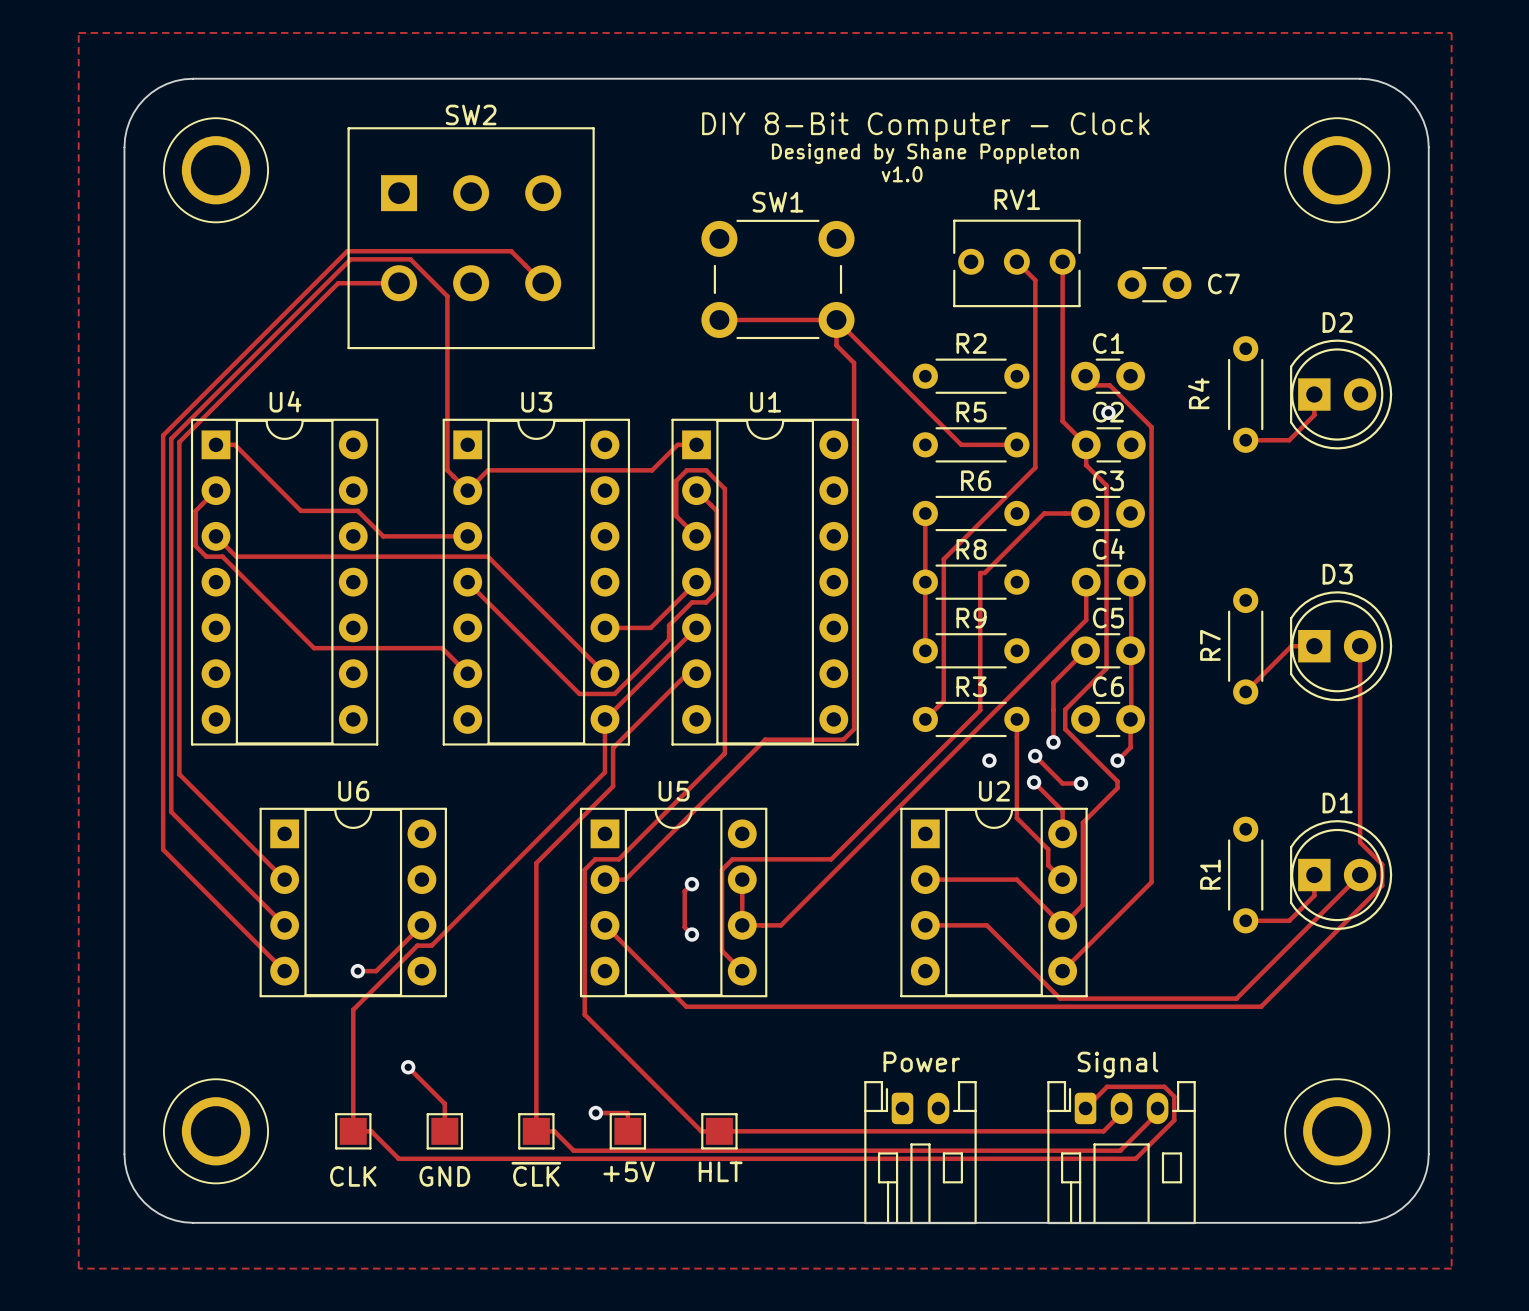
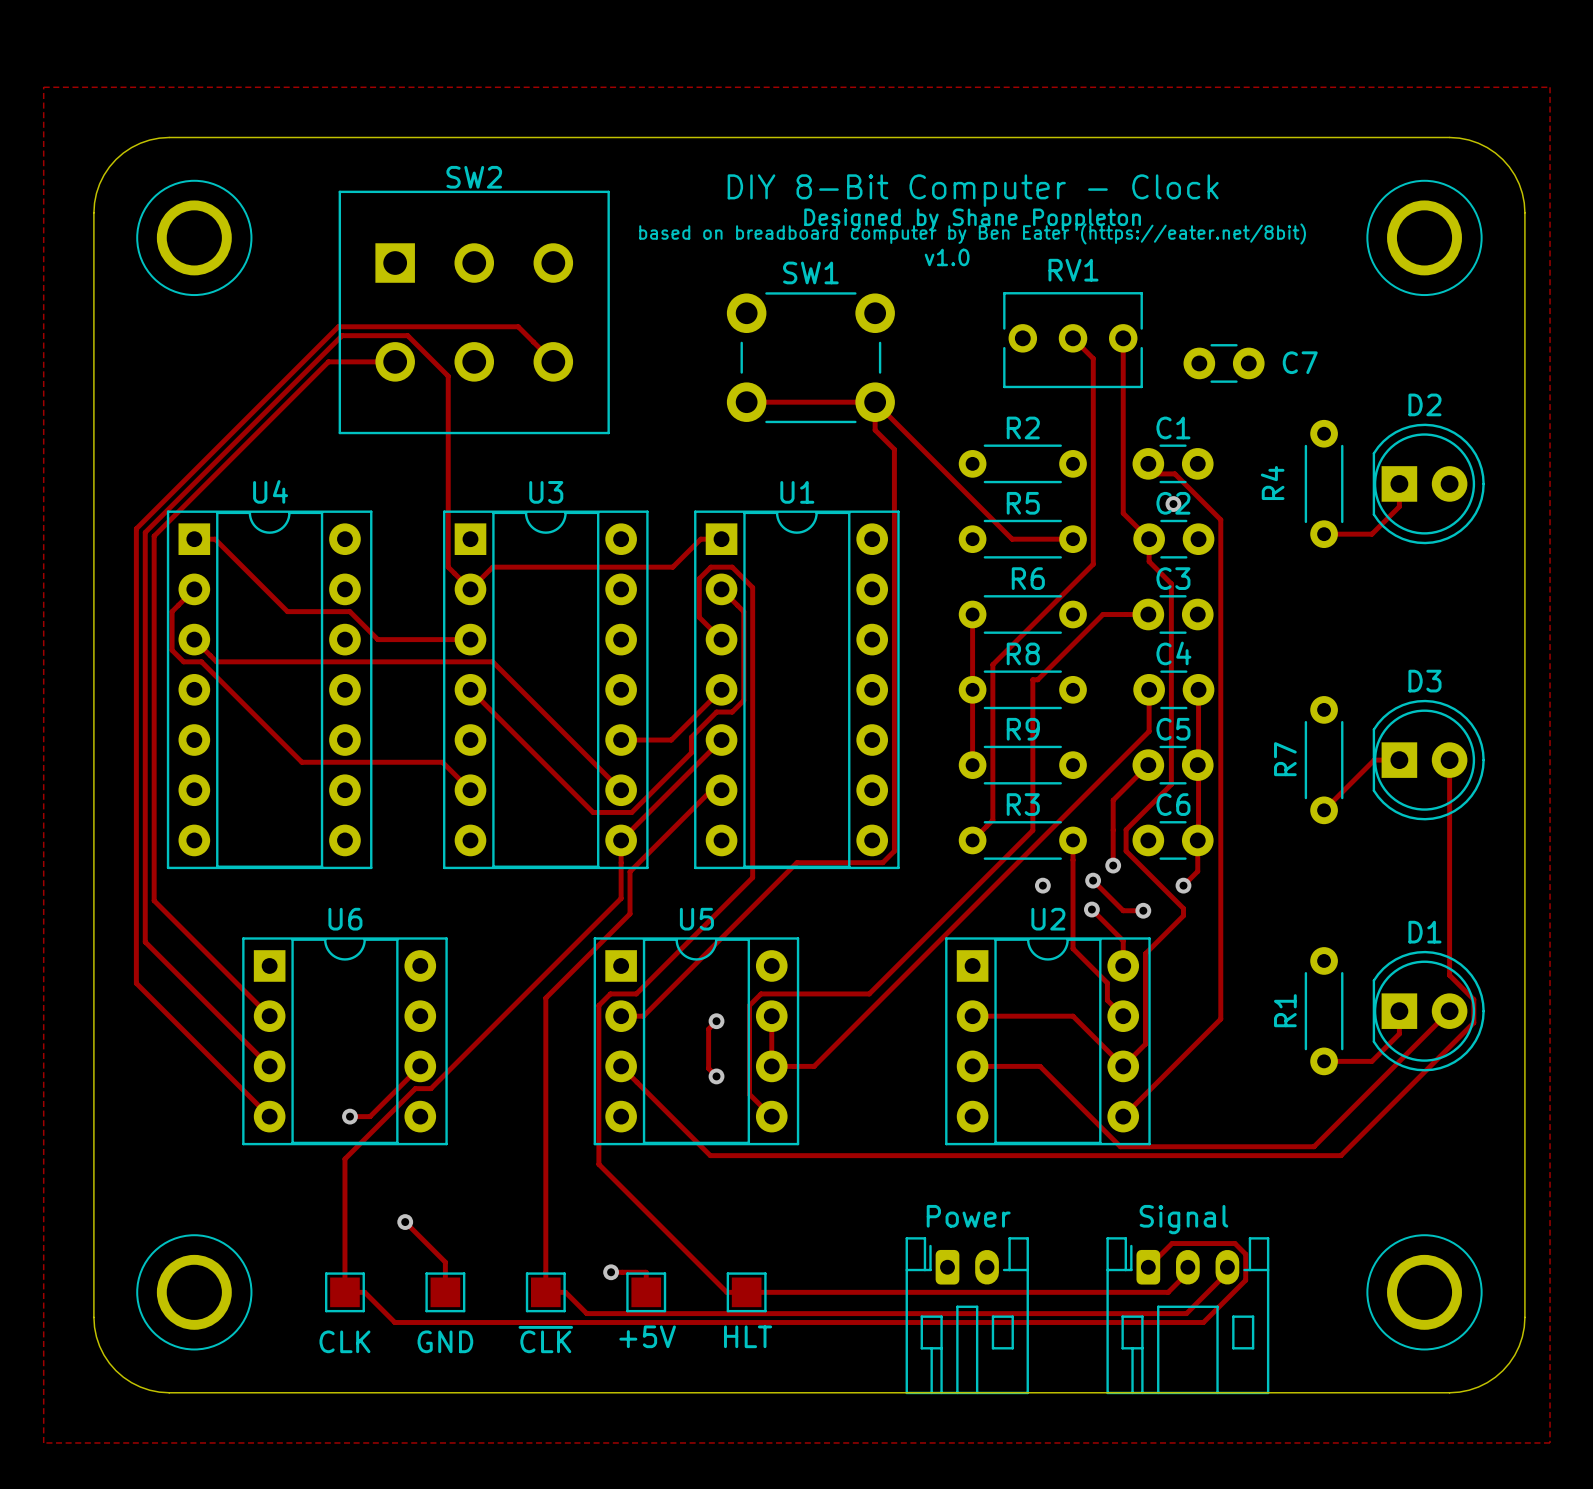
text: none -> based on breadboard computer by Ben Eater (https://eater.net/8bit) (972, 233)
text position: v1.0 (902, 174) -> v1.0 (947, 257)

